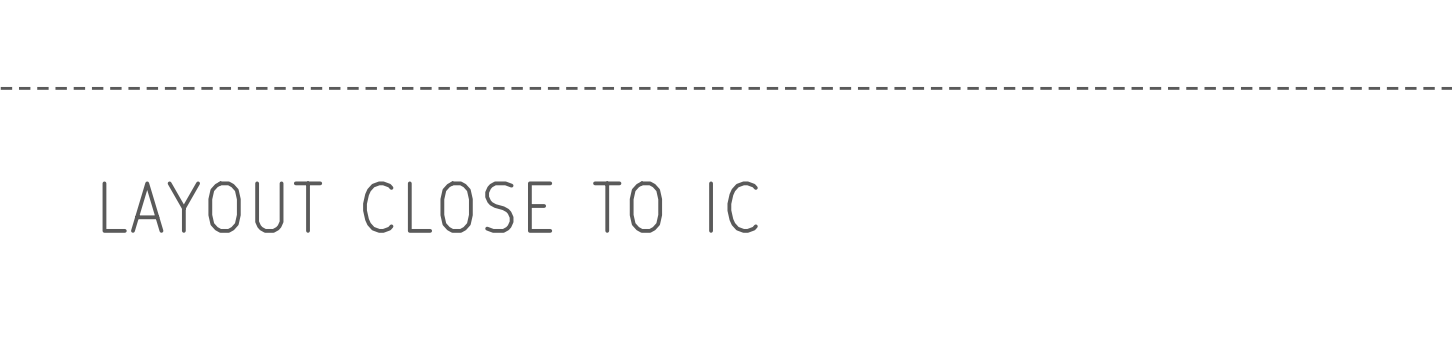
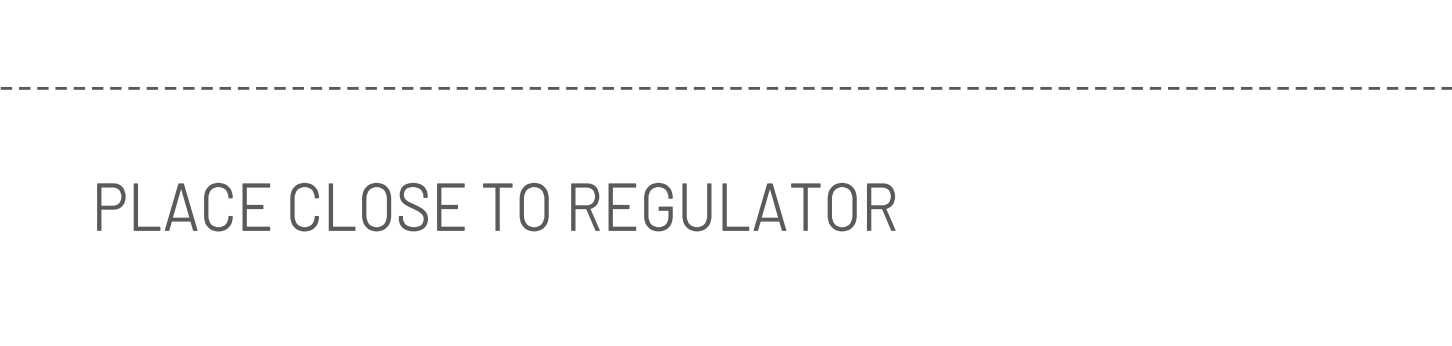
text: LAYOUT CLOSE TO IC (430, 207) -> PLACE CLOSE TO REGULATOR (496, 207)

